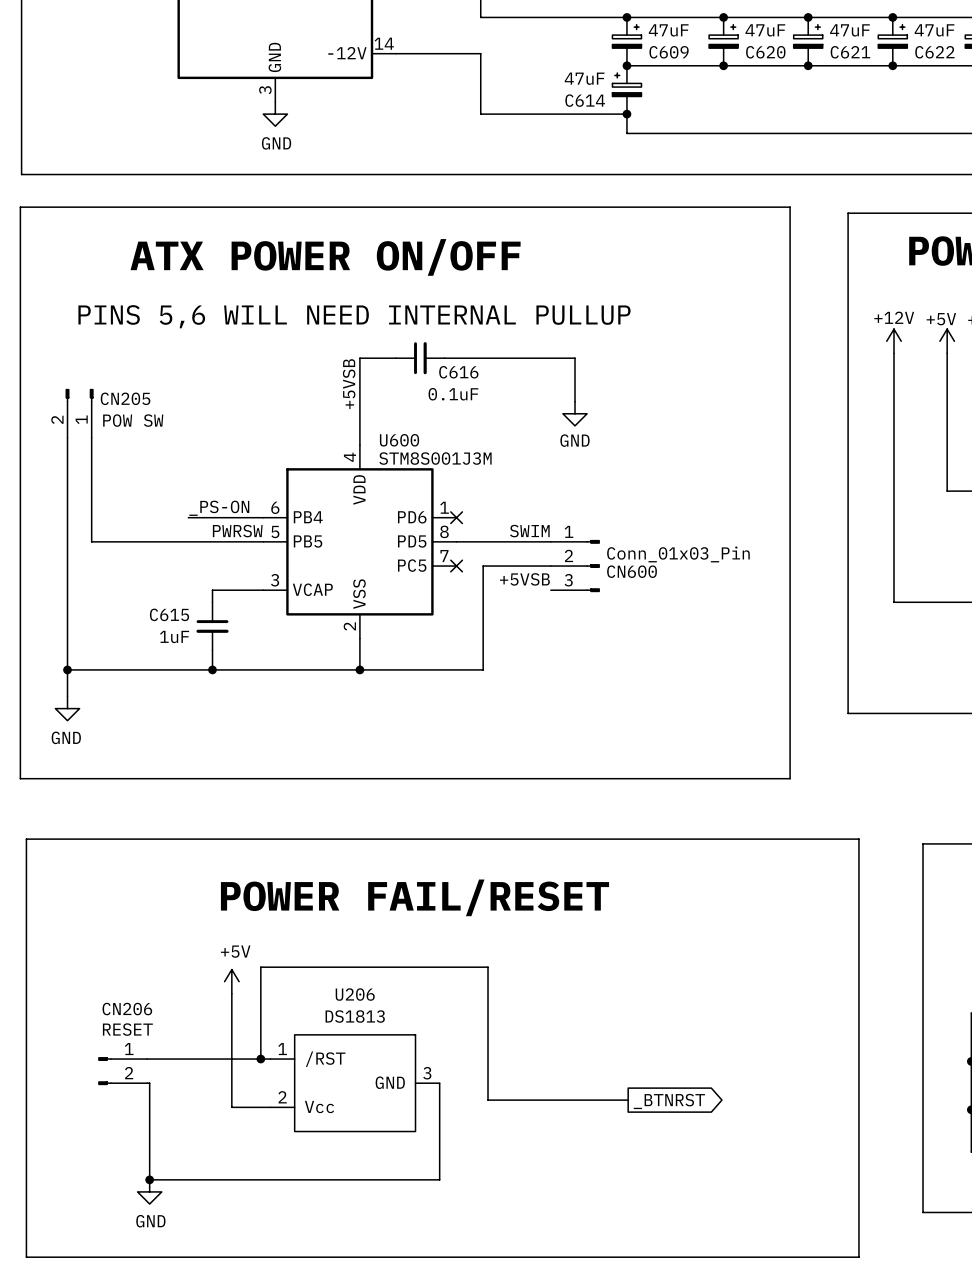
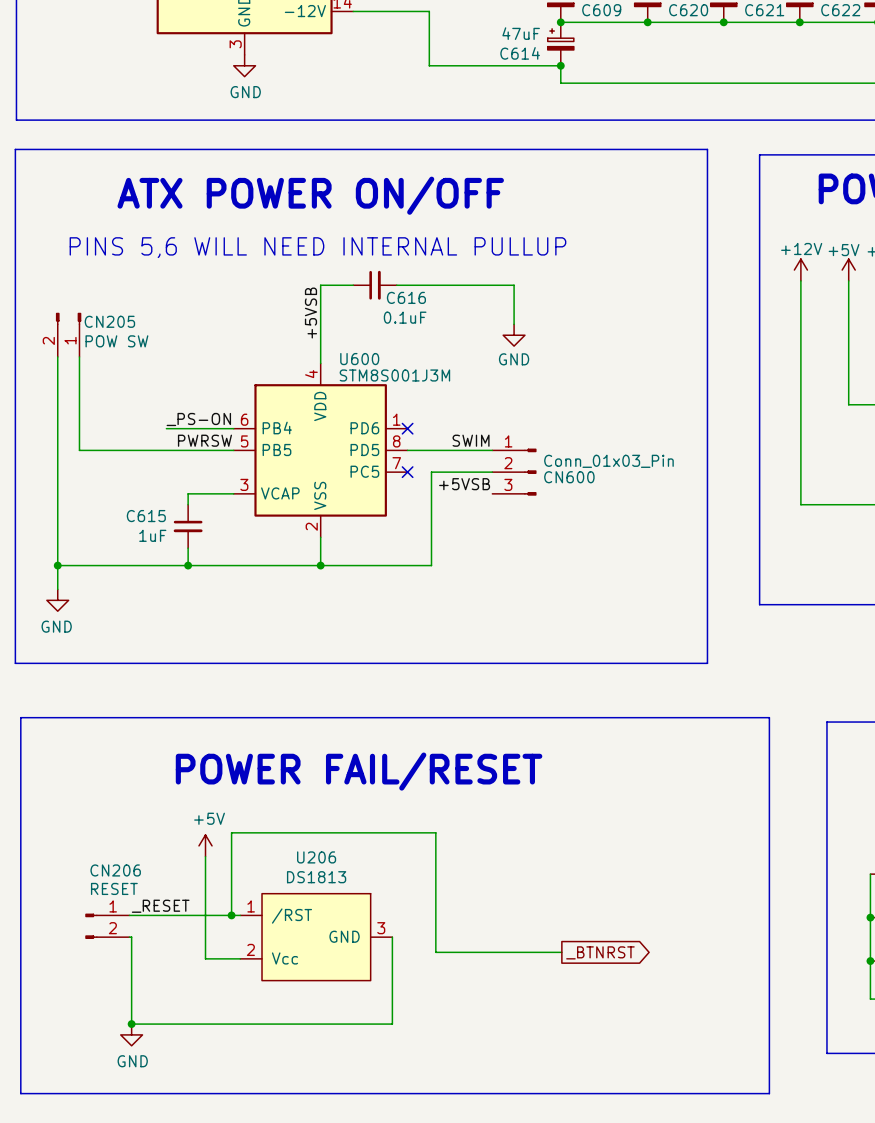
label: none -> _RESET (160, 906)

